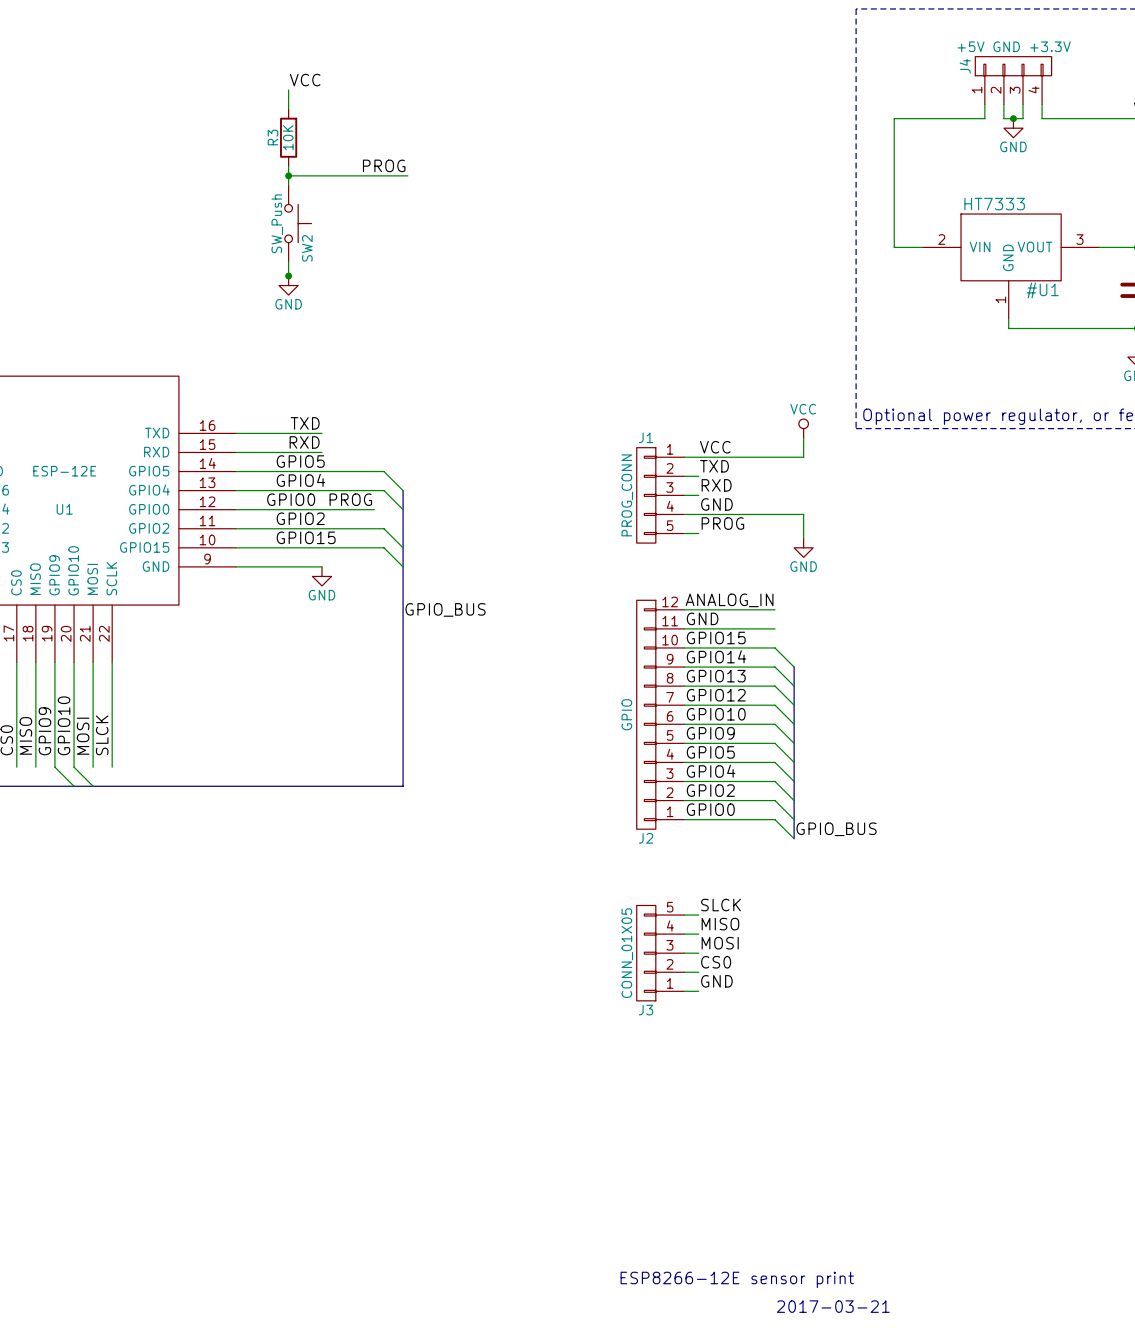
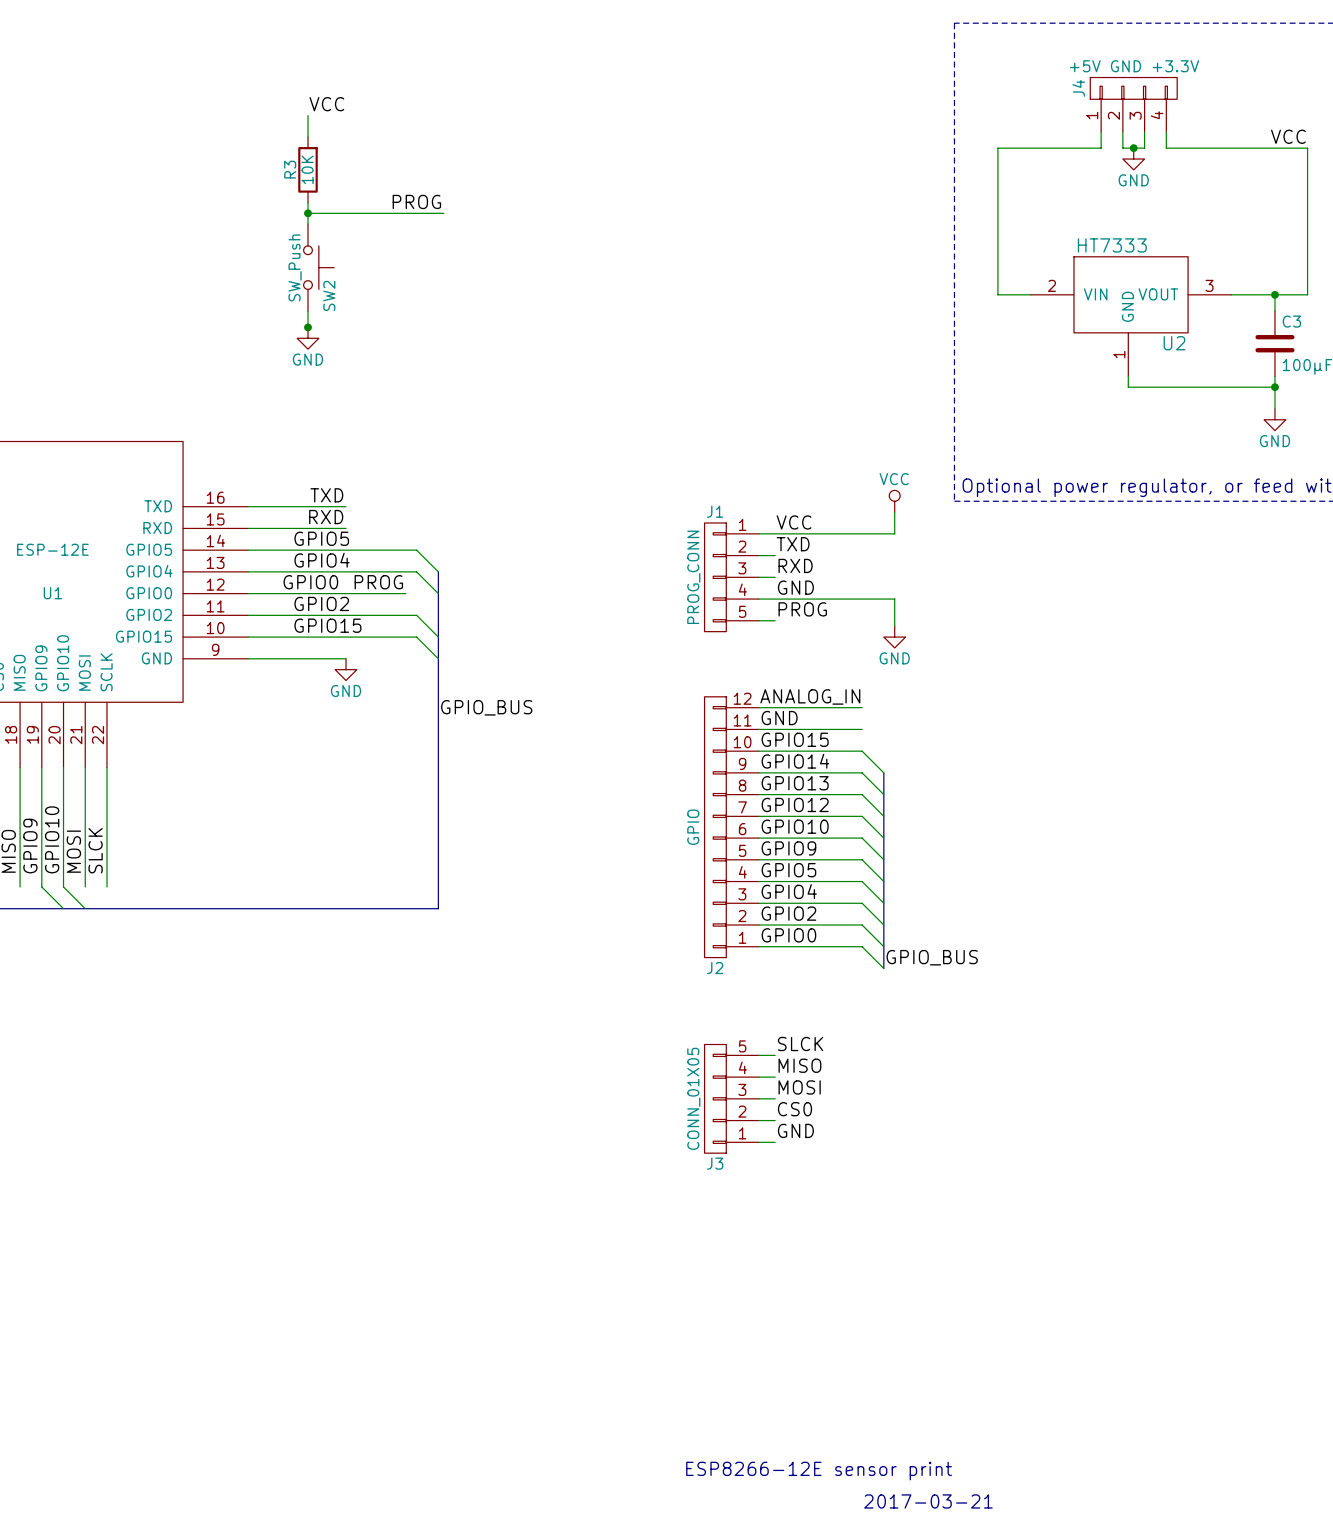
#U1: HT7333 (1011, 266) -> none
U2: none -> HT7333 (1131, 316)

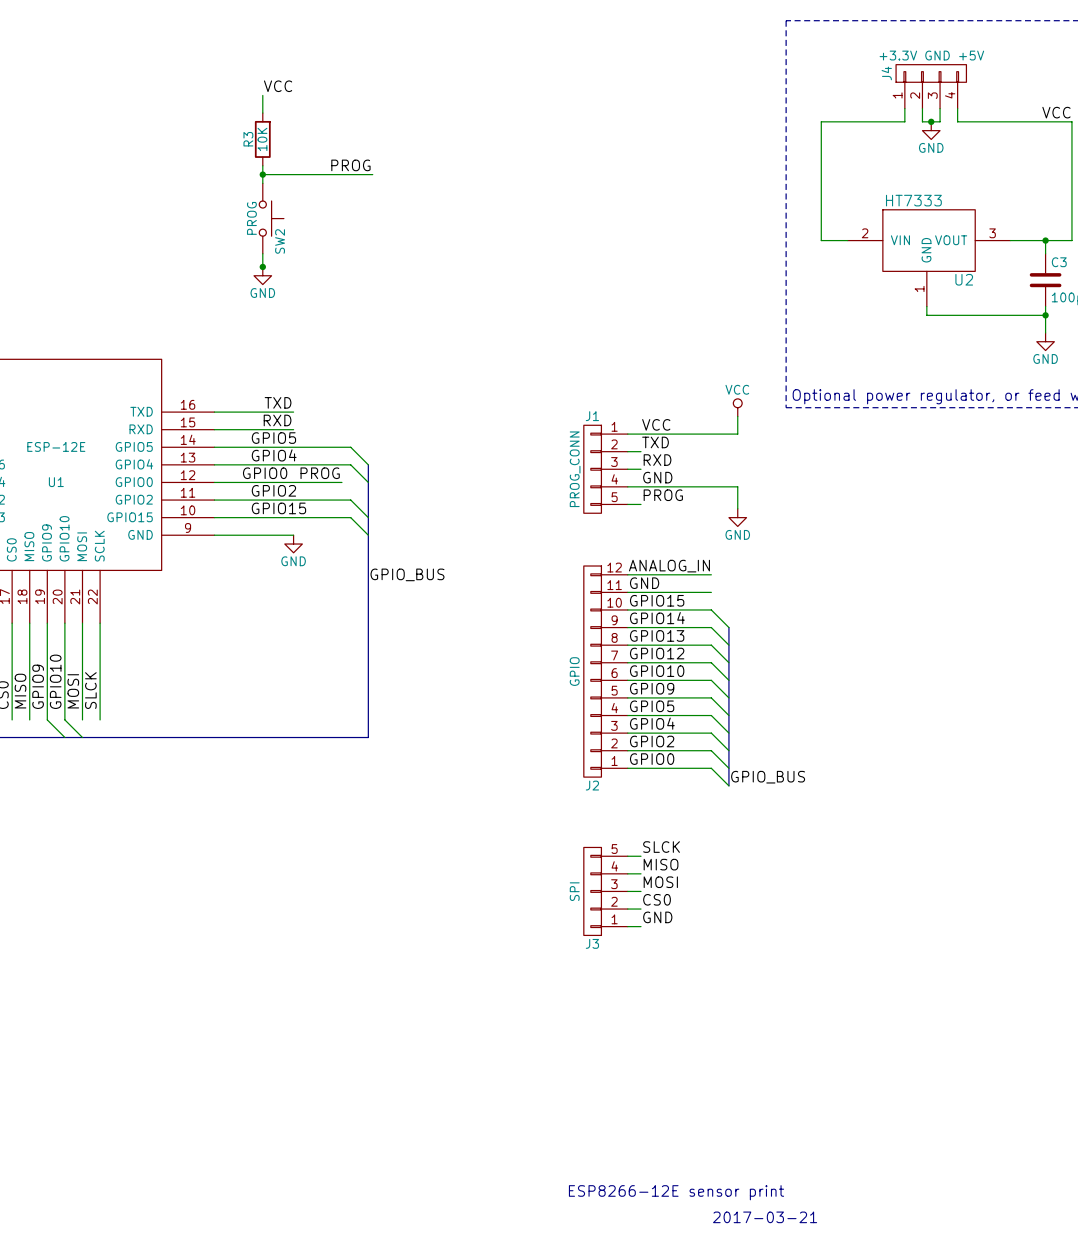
J4 value: +5V GND +3.3V (1134, 66) -> +3.3V GND +5V (931, 55)
SW2 value: SW_Push (295, 267) -> PROG (251, 218)
J3 value: CONN_01X05 (693, 1098) -> SPI (574, 891)

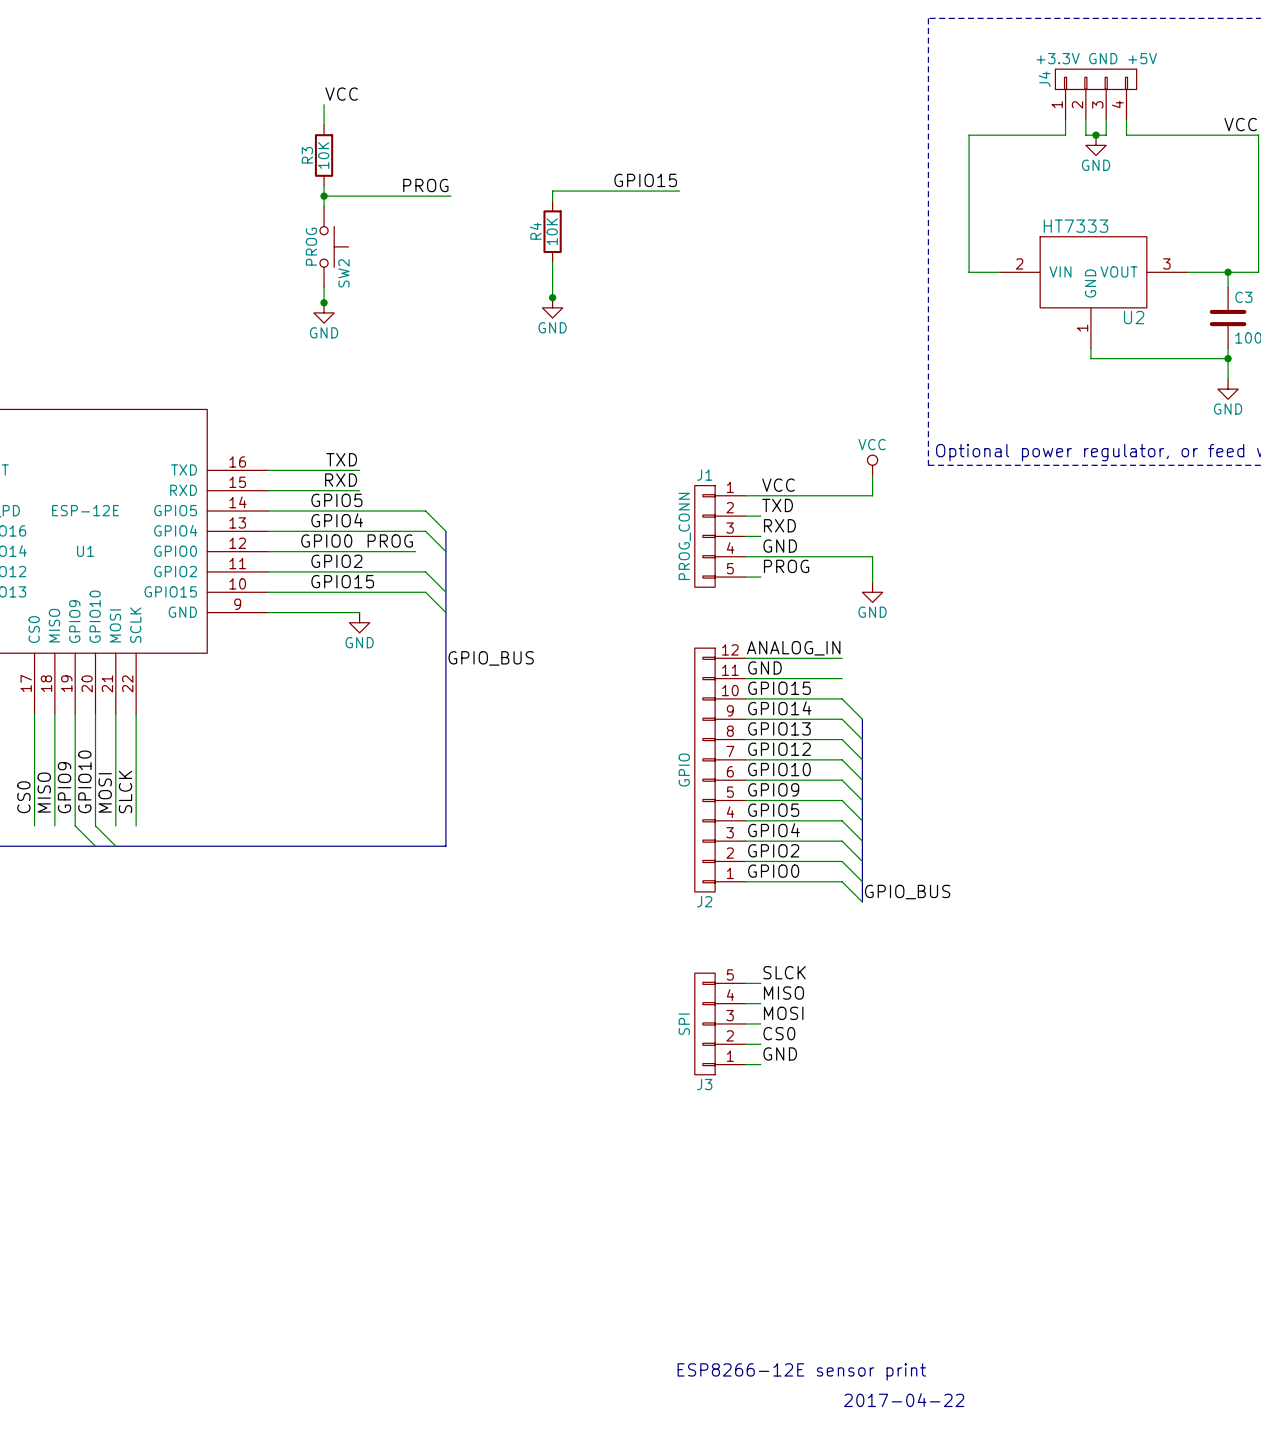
label: none -> GPIO15 (645, 180)
wire: none -> (679, 191) (552, 191) (552, 201)
R4: none -> 10K (552, 231)
wire: none -> (552, 262) (552, 297)
junction: none -> (552, 297)
power symbol: none -> GND (552, 307)
text: 2017-03-21 (765, 1217) -> 2017-04-22 (904, 1400)

